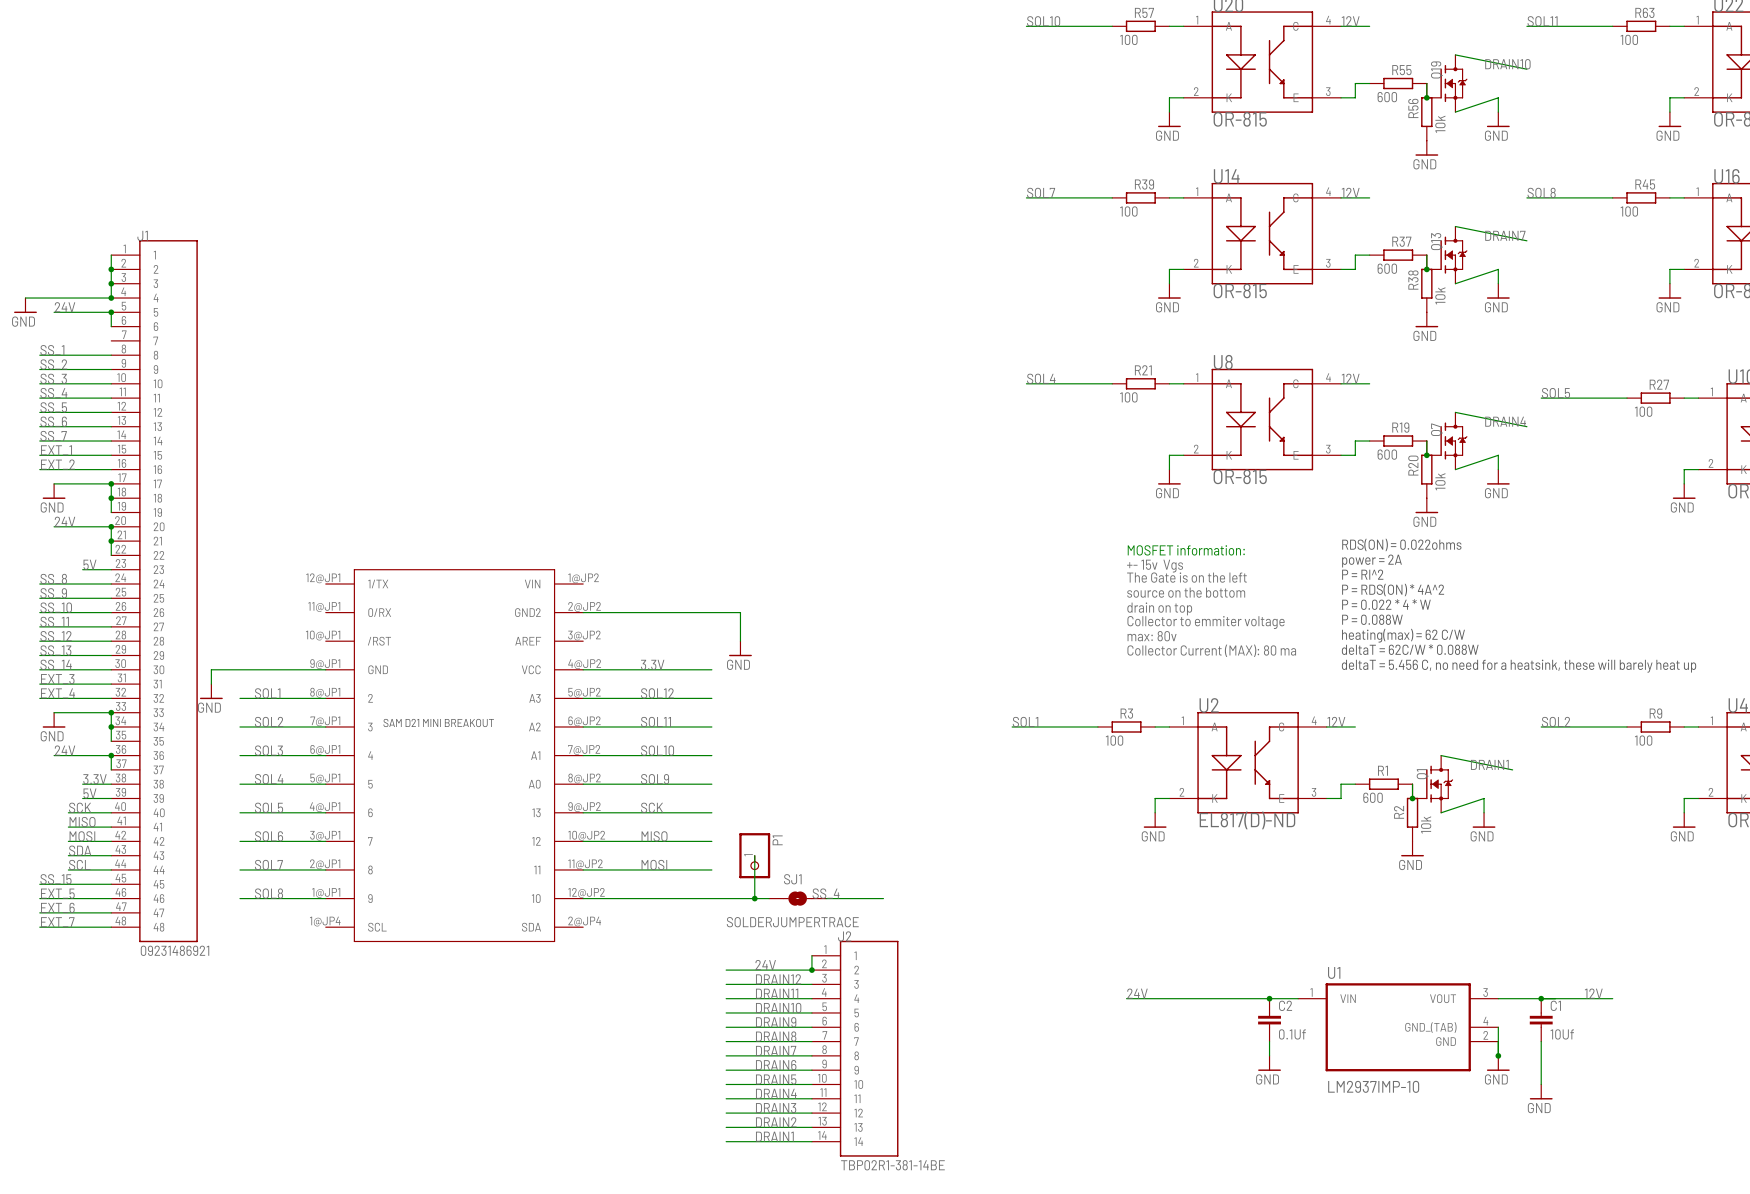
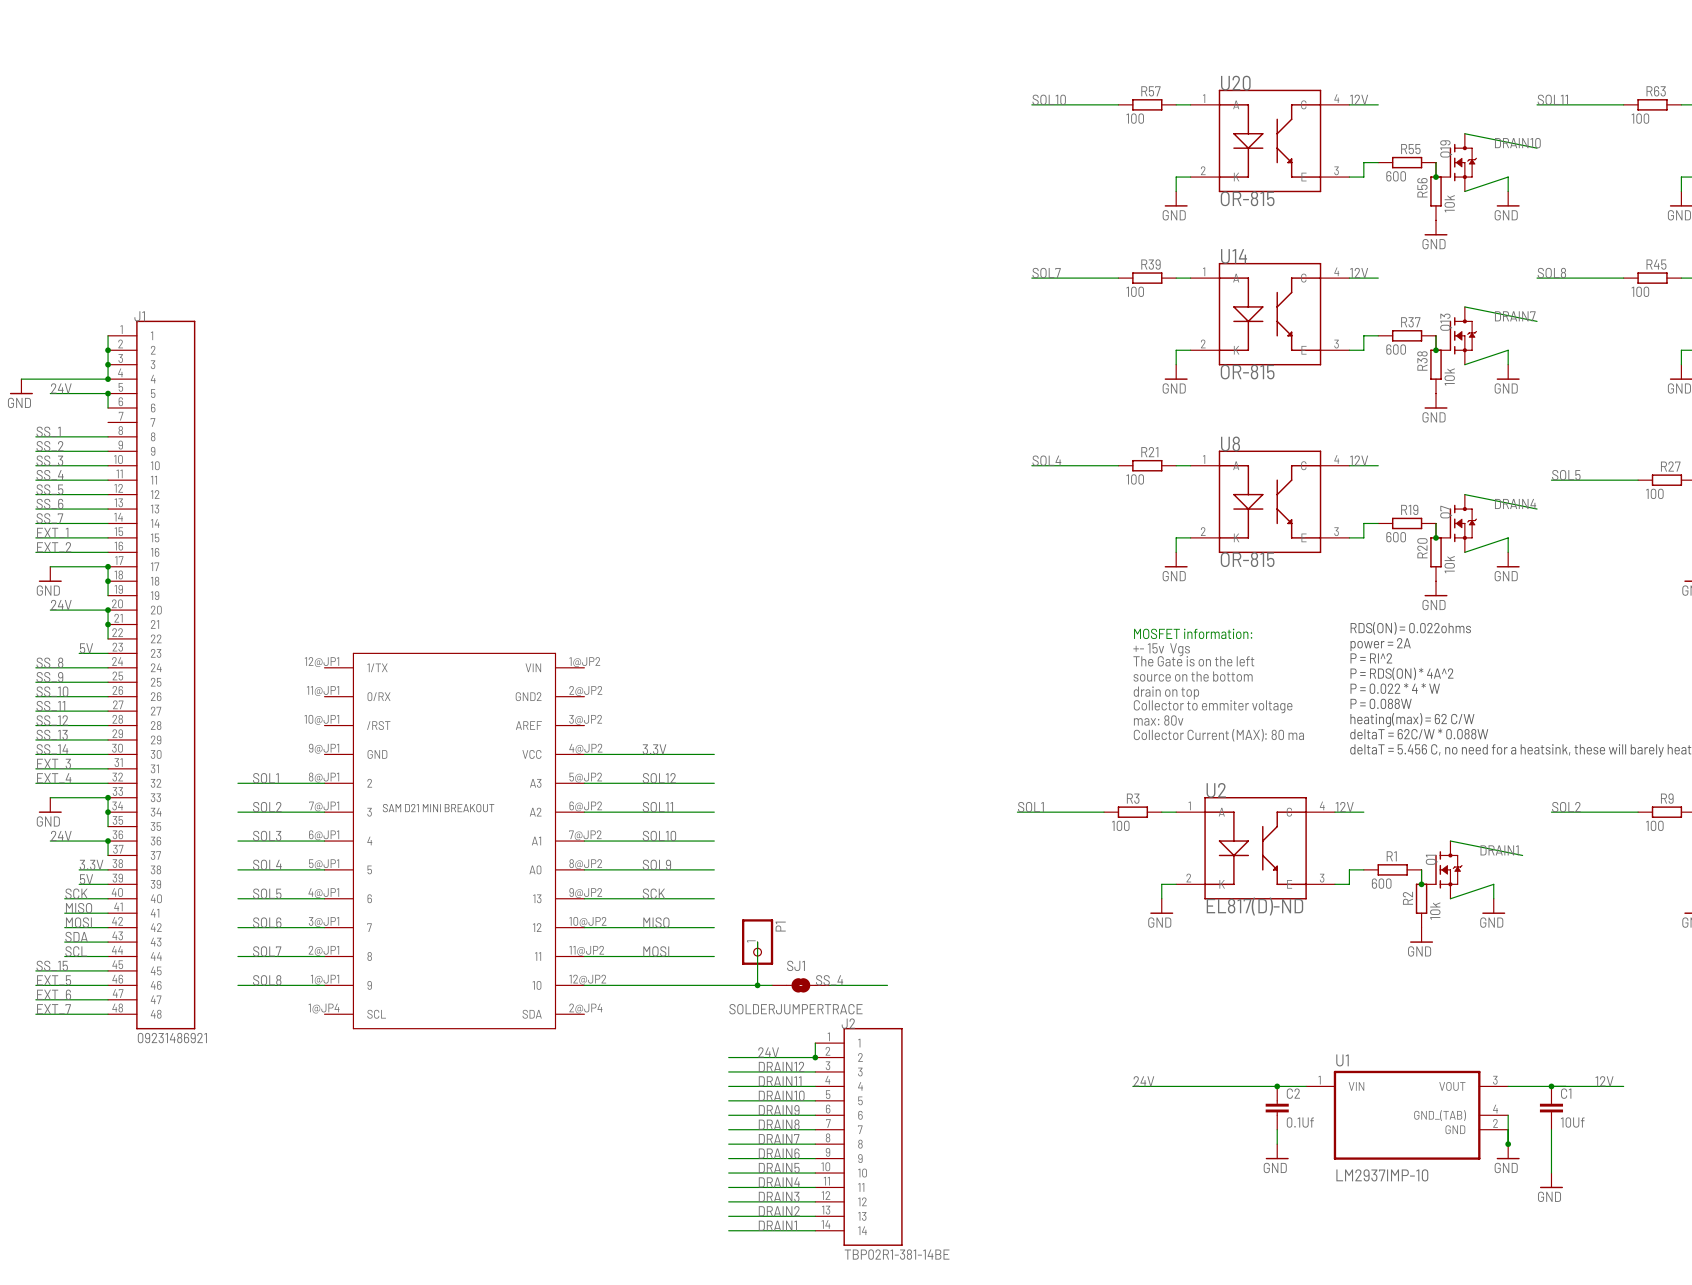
wire: (583, 612) (740, 612) (740, 641) -> none
power symbol: GND (740, 648) -> none
wire: (325, 669) (211, 669) (211, 684) -> none
power symbol: GND (211, 691) -> none

